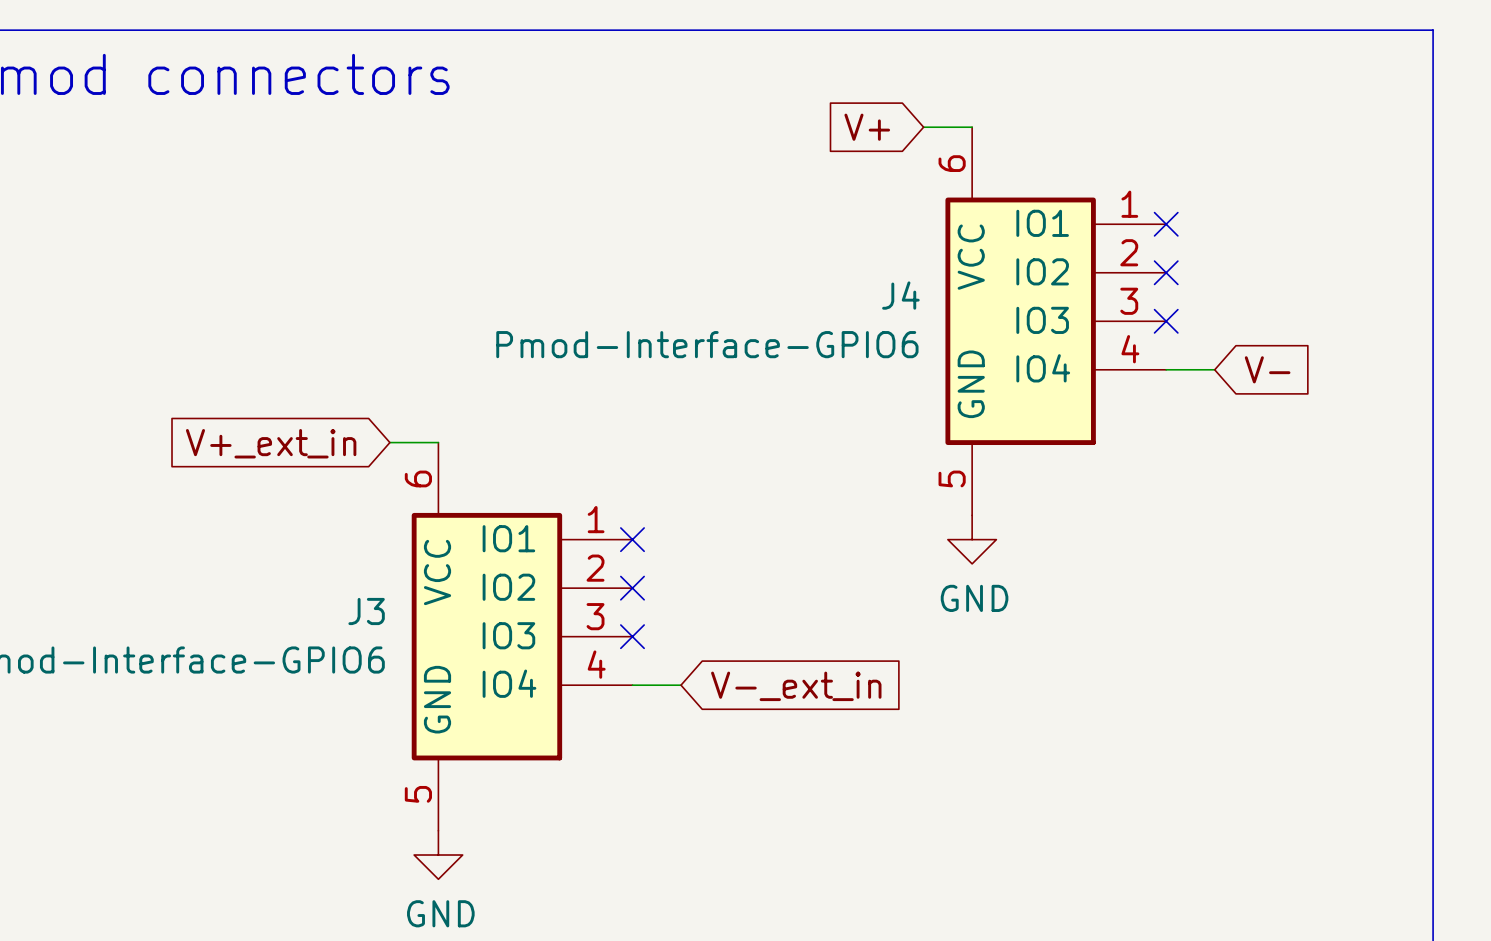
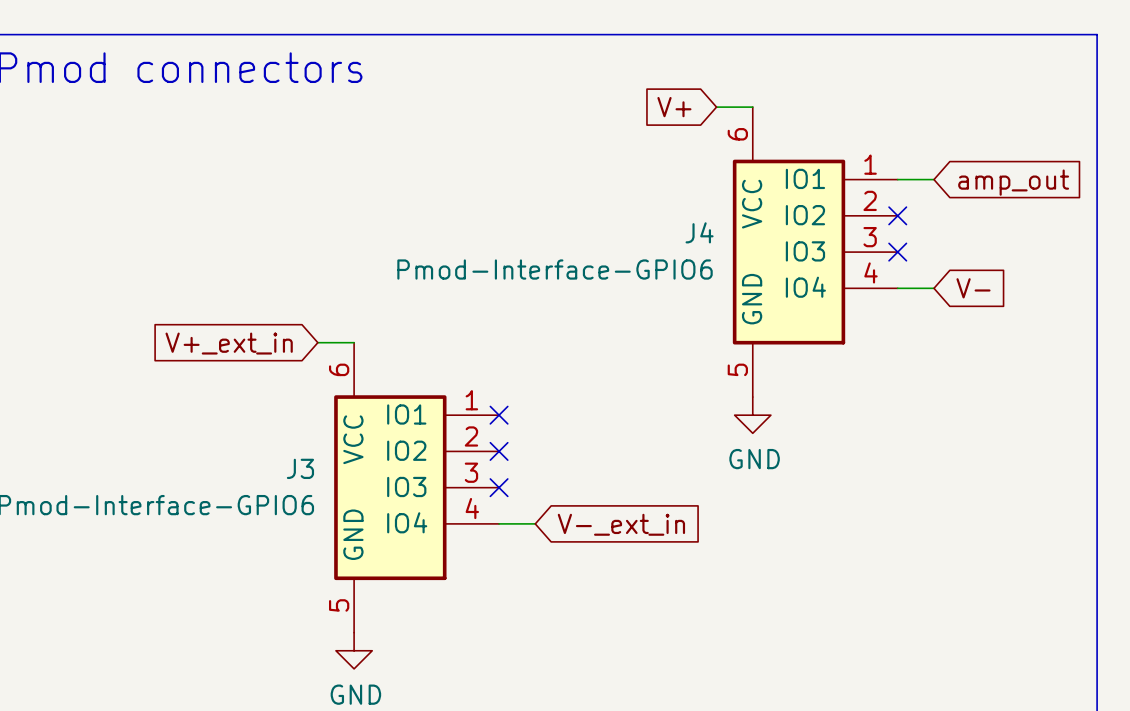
wire: none -> (897, 179) (933, 179)
no-connect mark: (1166, 224) -> none
global label: none -> amp_out (1013, 182)

